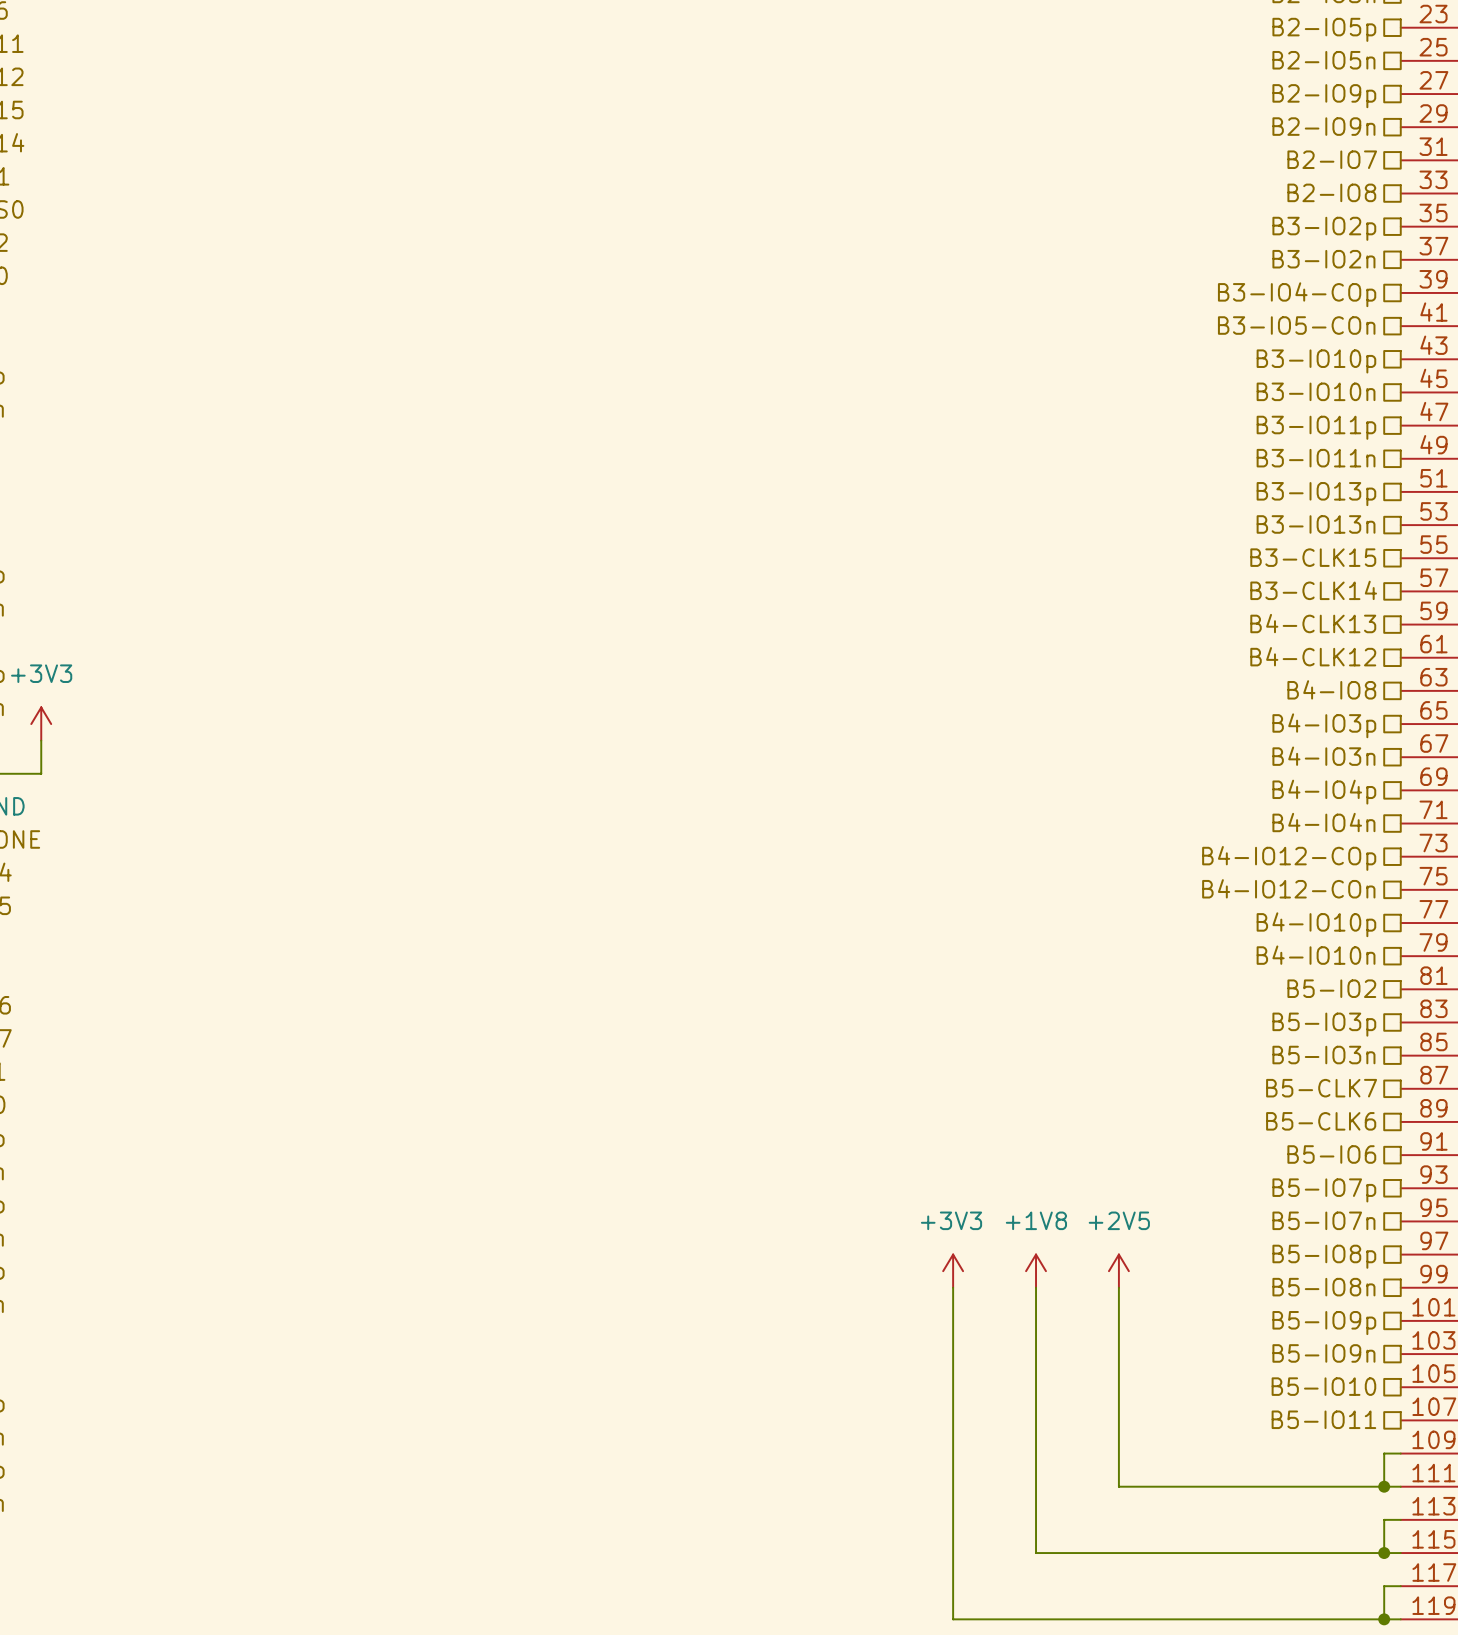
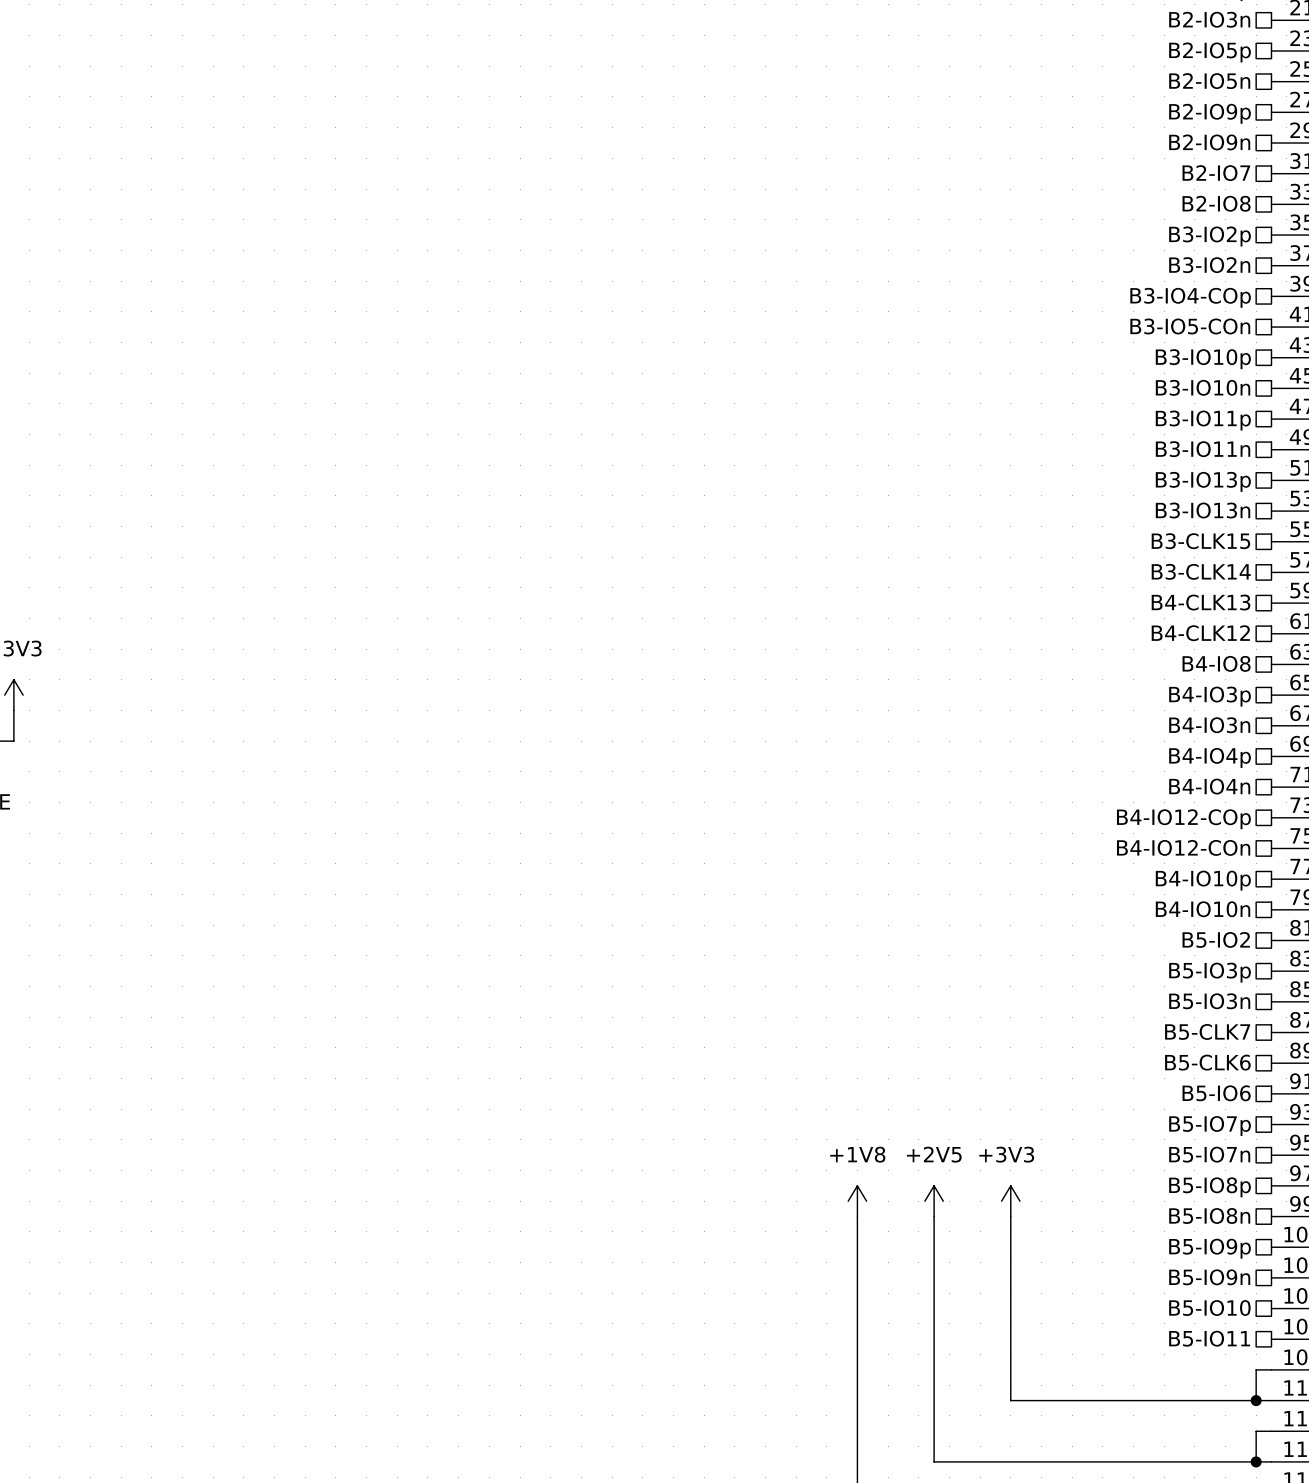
power symbol: +3V3 (953, 1271) -> +1V8 (857, 1201)
power symbol: +1V8 (1036, 1271) -> +2V5 (934, 1201)
power symbol: +2V5 (1118, 1271) -> +3V3 (1010, 1201)

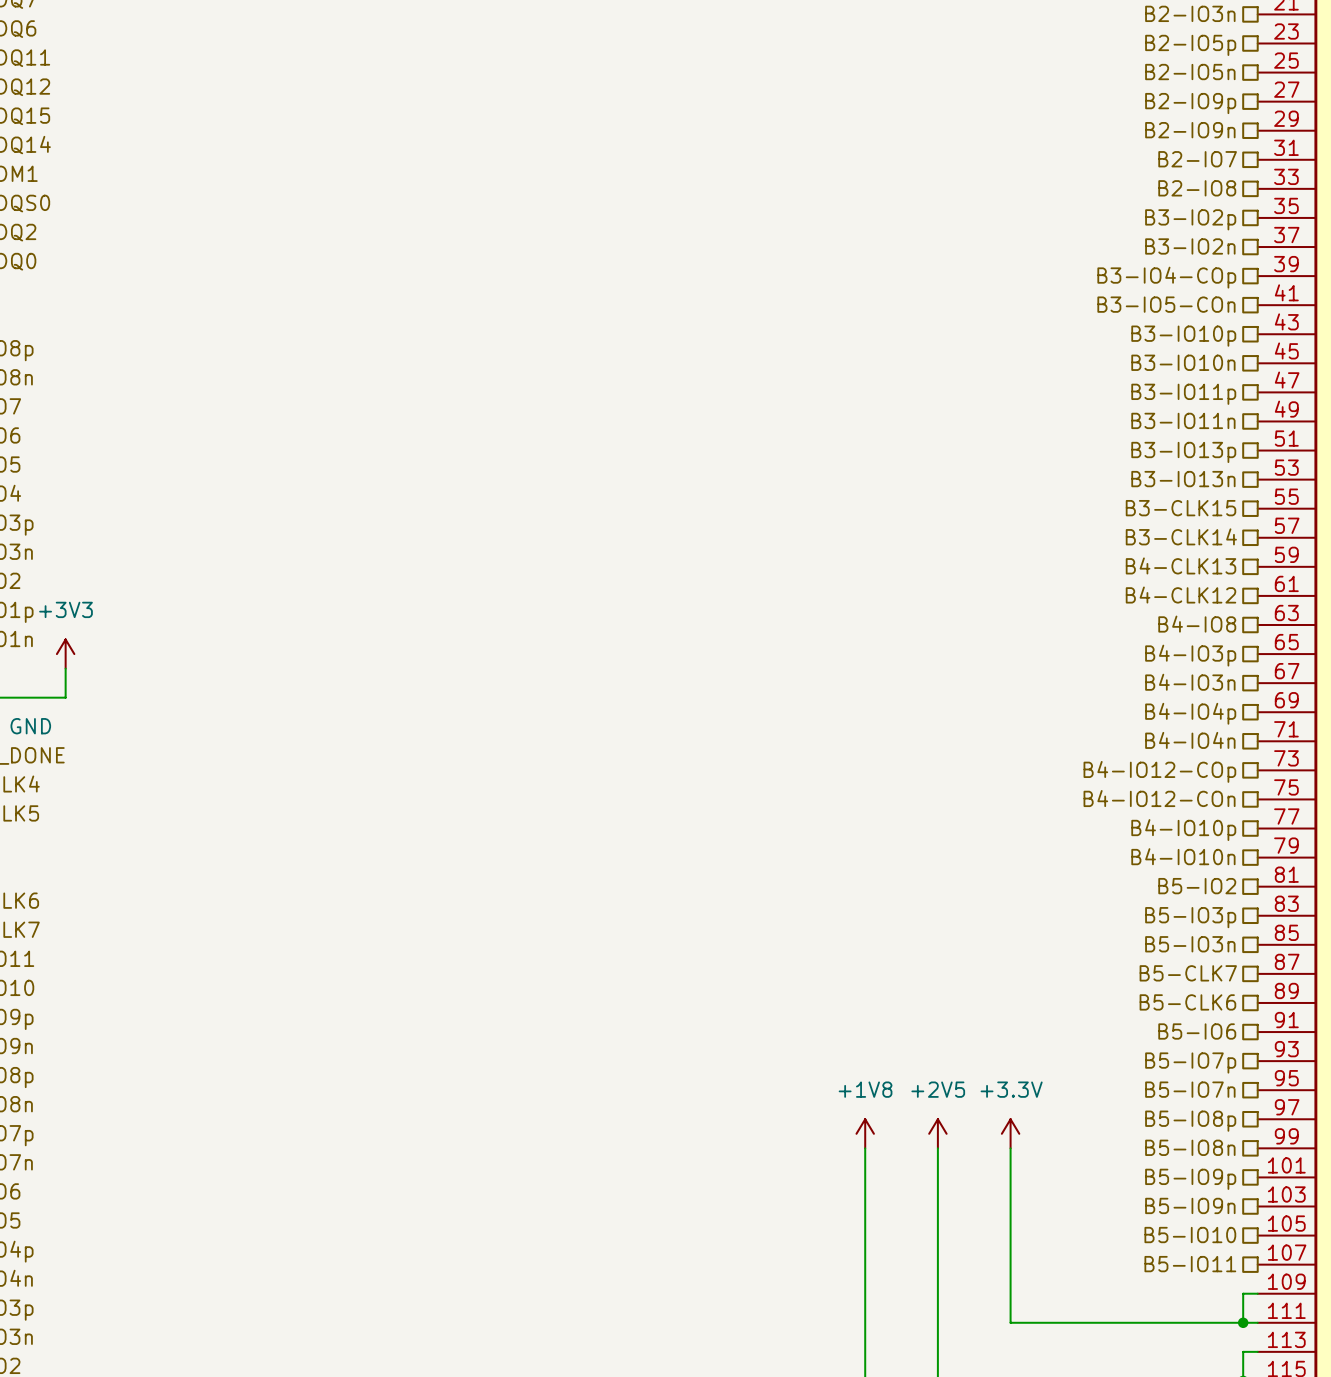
power symbol: +3V3 (1010, 1201) -> +3.3V (1010, 1133)

